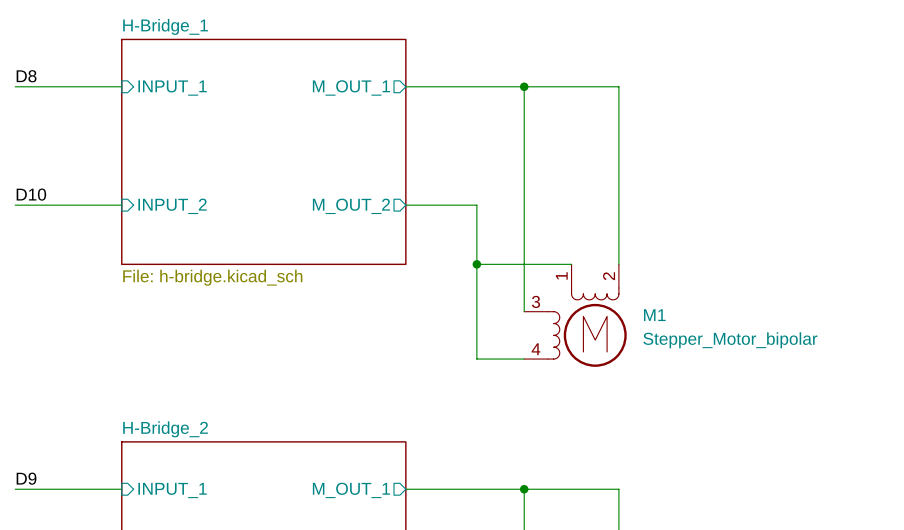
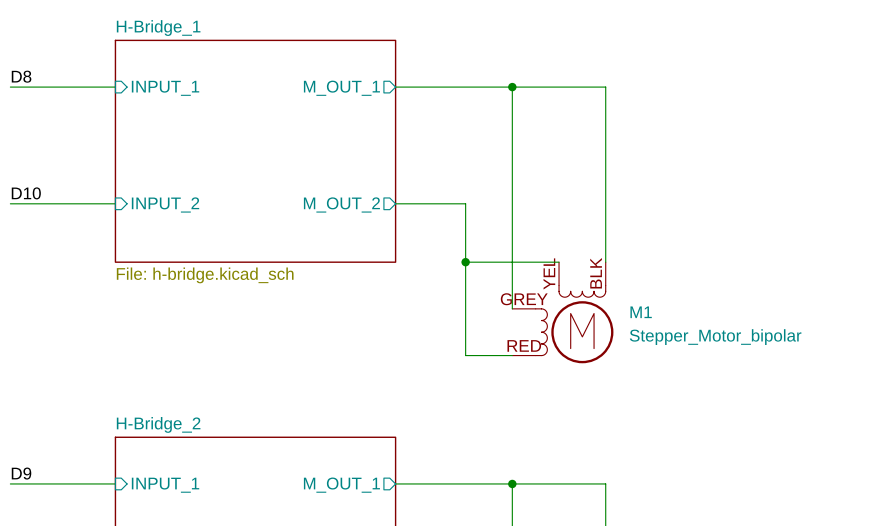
M1 pin number: 1 (561, 275) -> YEL (549, 273)
M1 pin number: 2 (609, 276) -> BLK (596, 273)
M1 pin number: 3 (536, 301) -> GREY (524, 299)
M1 pin number: 4 (536, 349) -> RED (524, 345)

